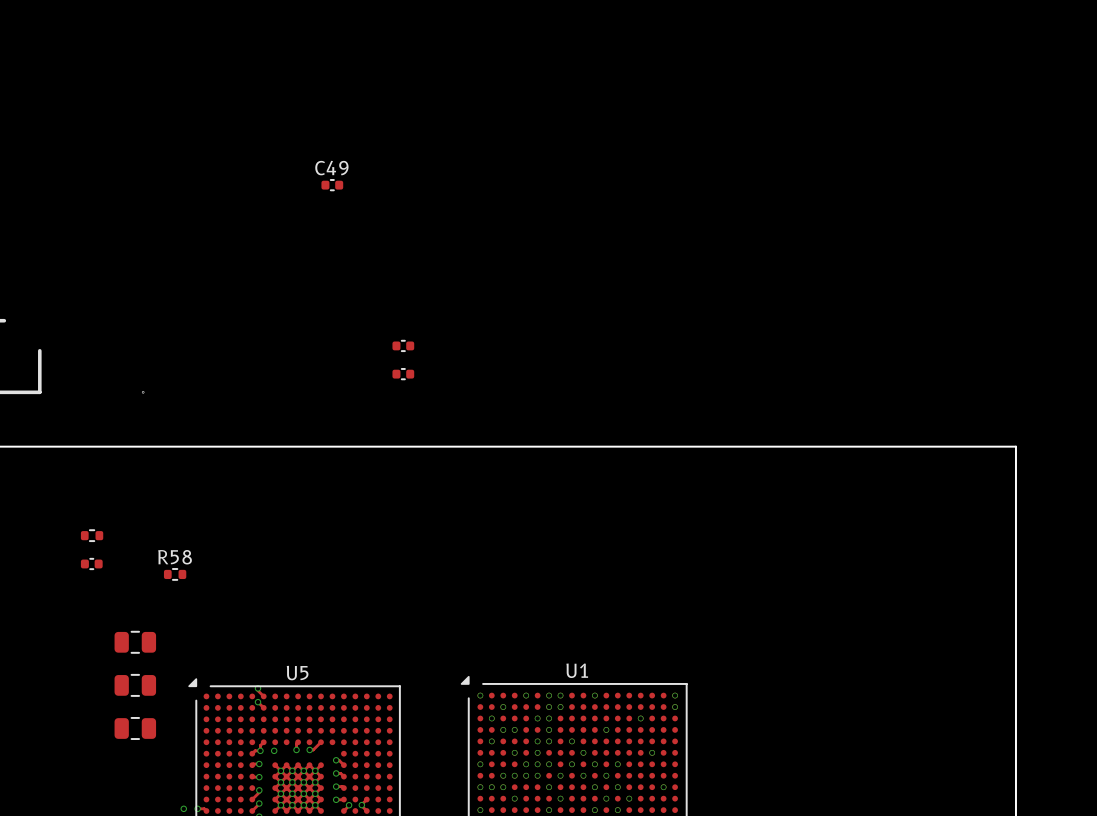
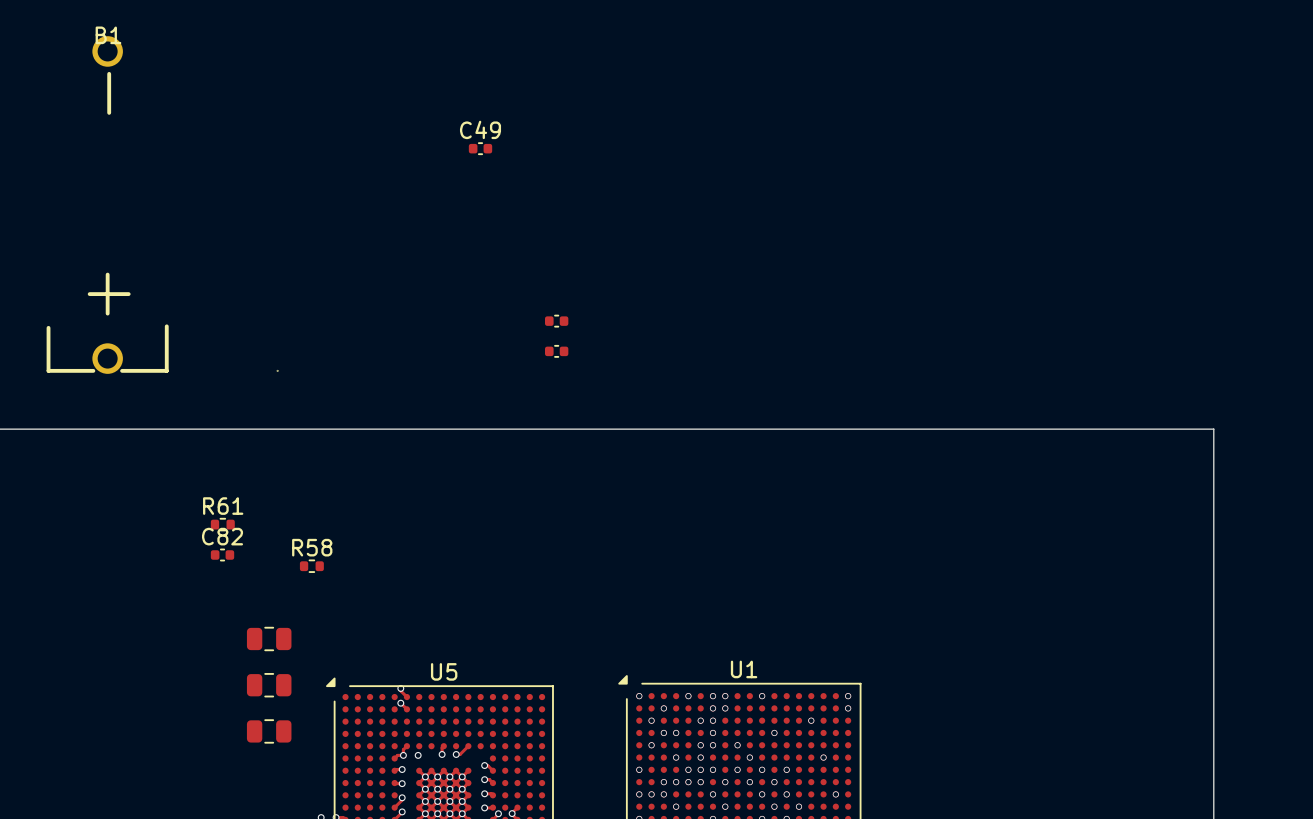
R61 name: none -> R61 (223, 506)
C82 name: none -> C82 (222, 536)

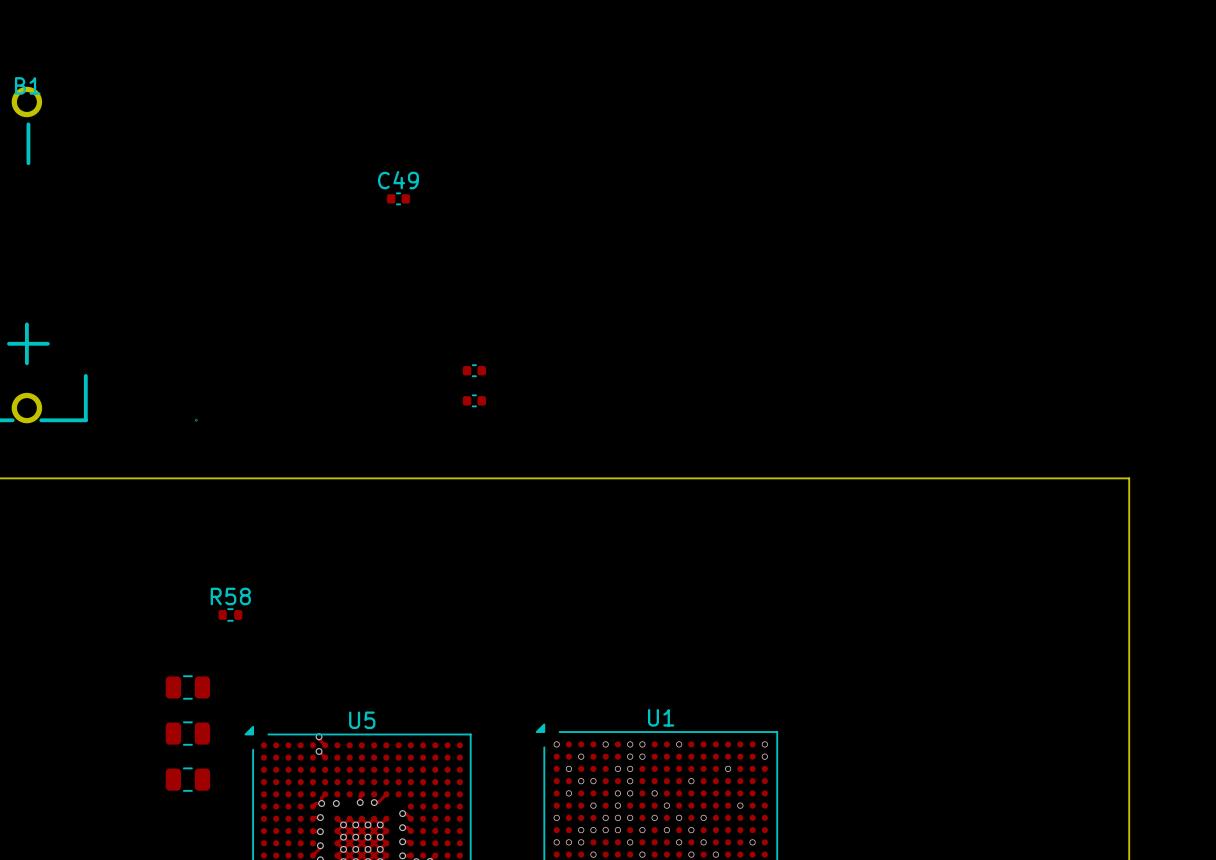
R61: (222, 524) -> none
C82: (222, 554) -> none

